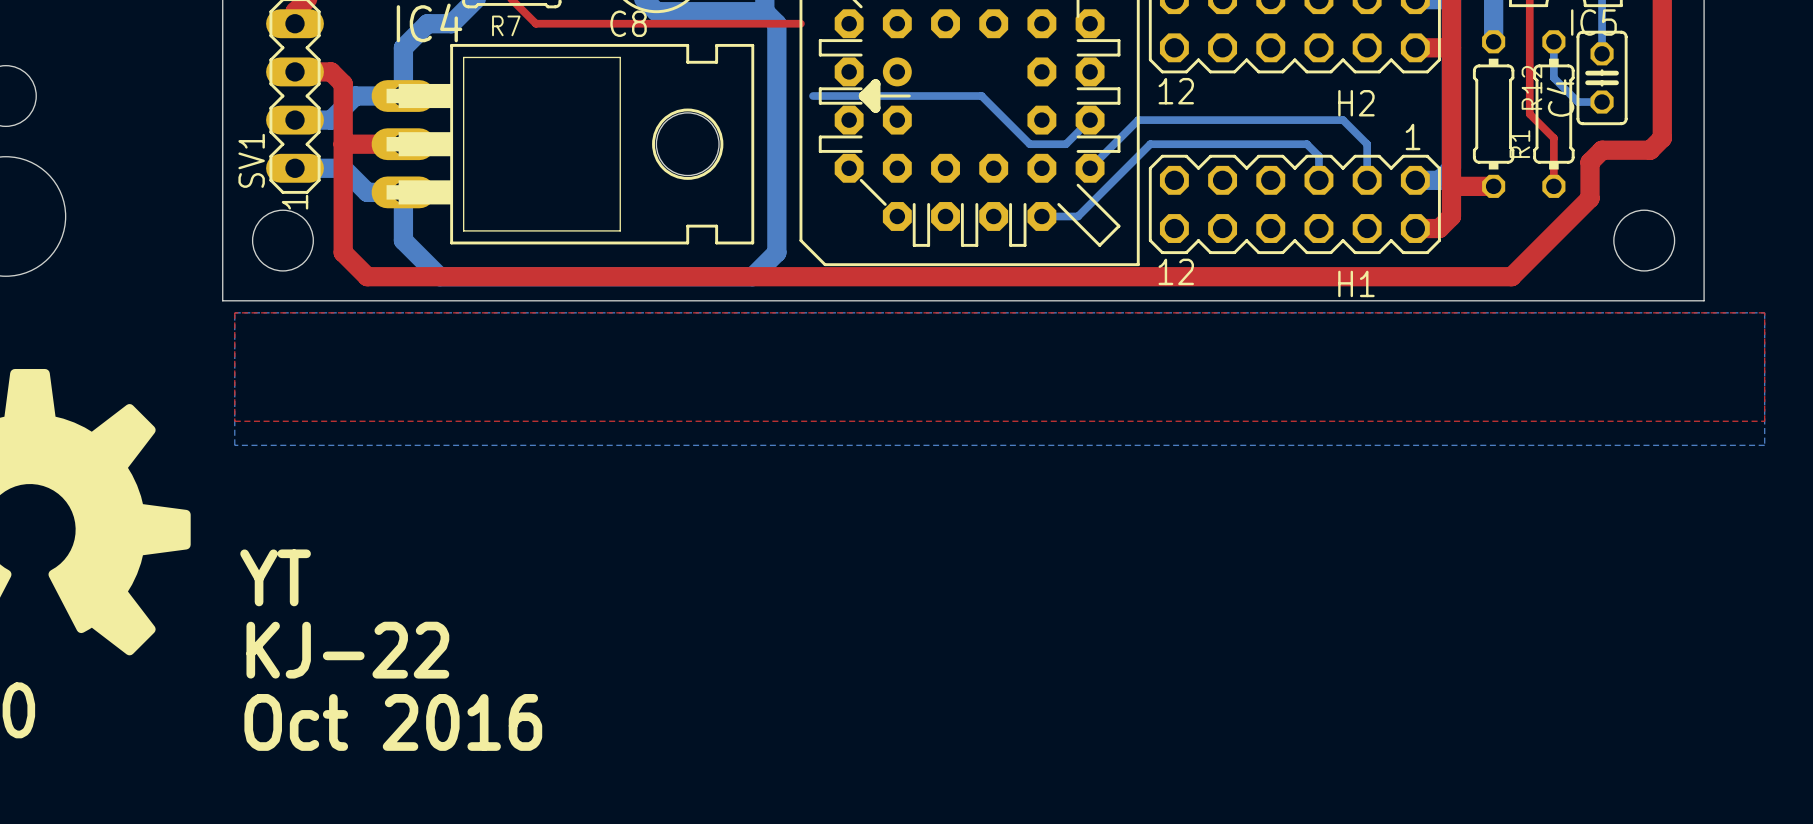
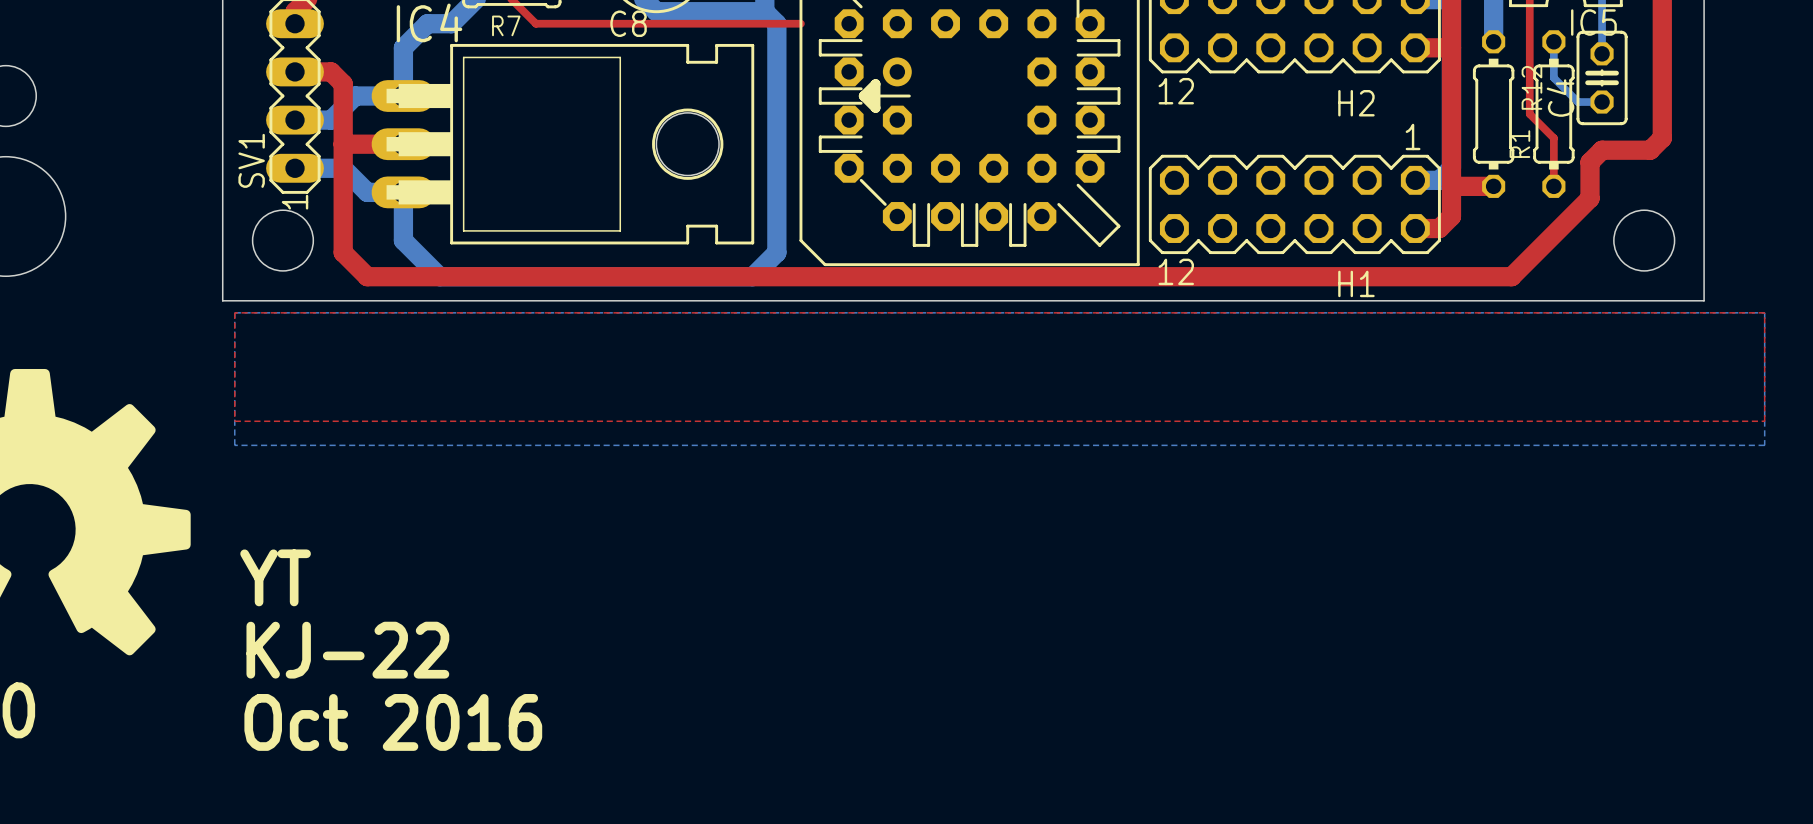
bottom track: (813, 96) (981, 96) (1029, 144) (1065, 144) (1090, 120) -> none
bottom track: (1090, 168) (1138, 120) (1343, 120) (1367, 144) (1367, 180) -> none
bottom track: (1318, 180) (1318, 156) (1306, 144) (1150, 144) (1078, 216) (1041, 216) -> none

